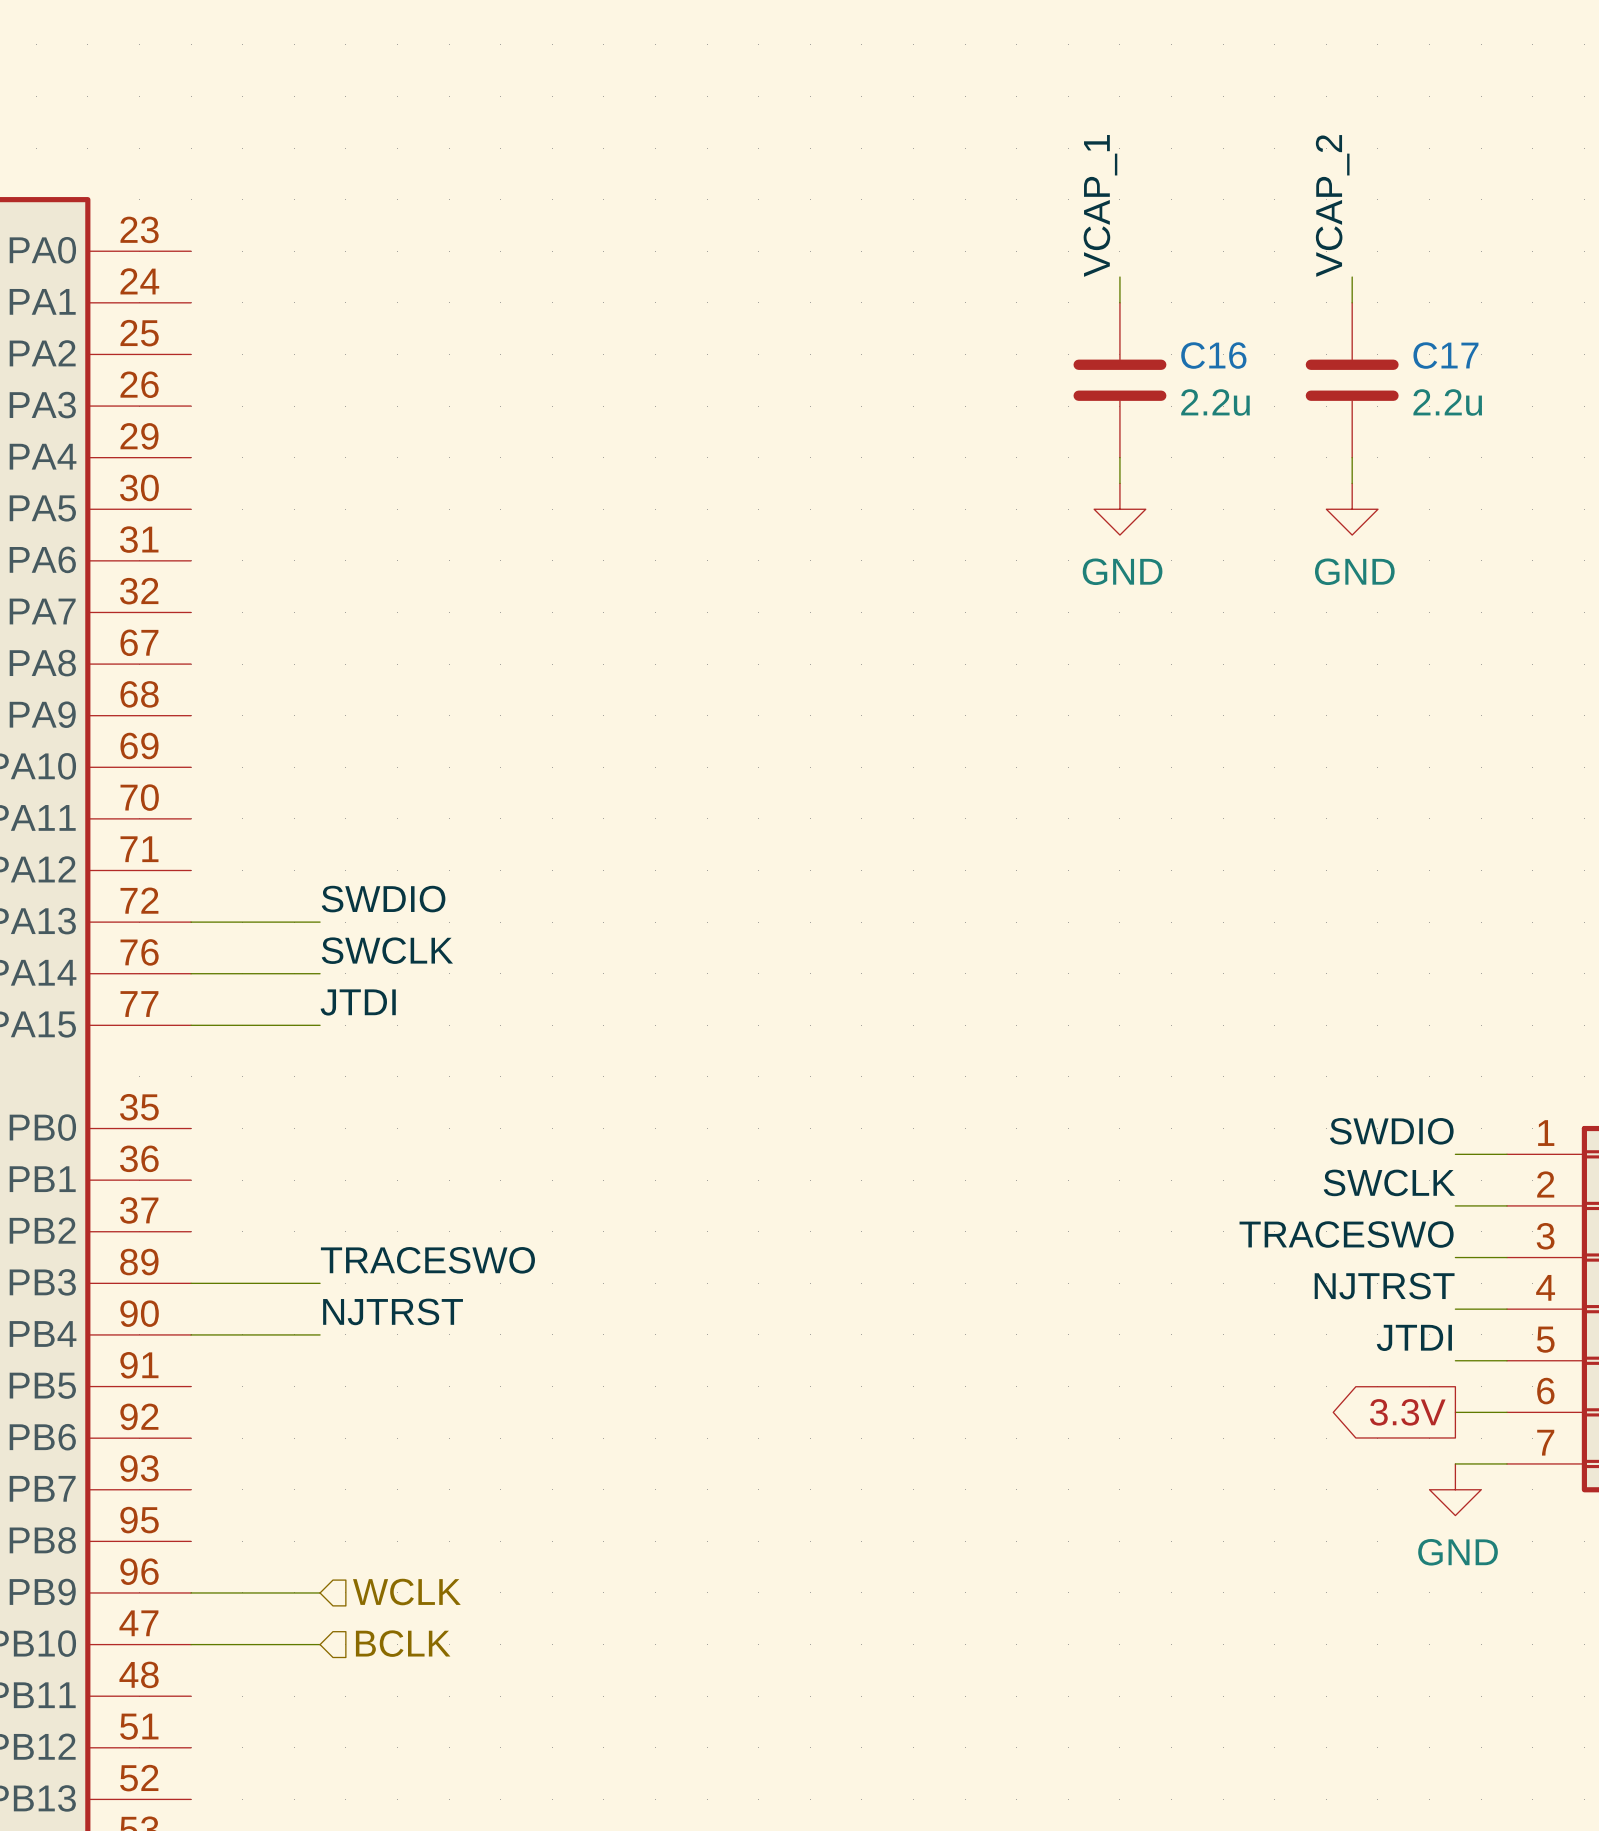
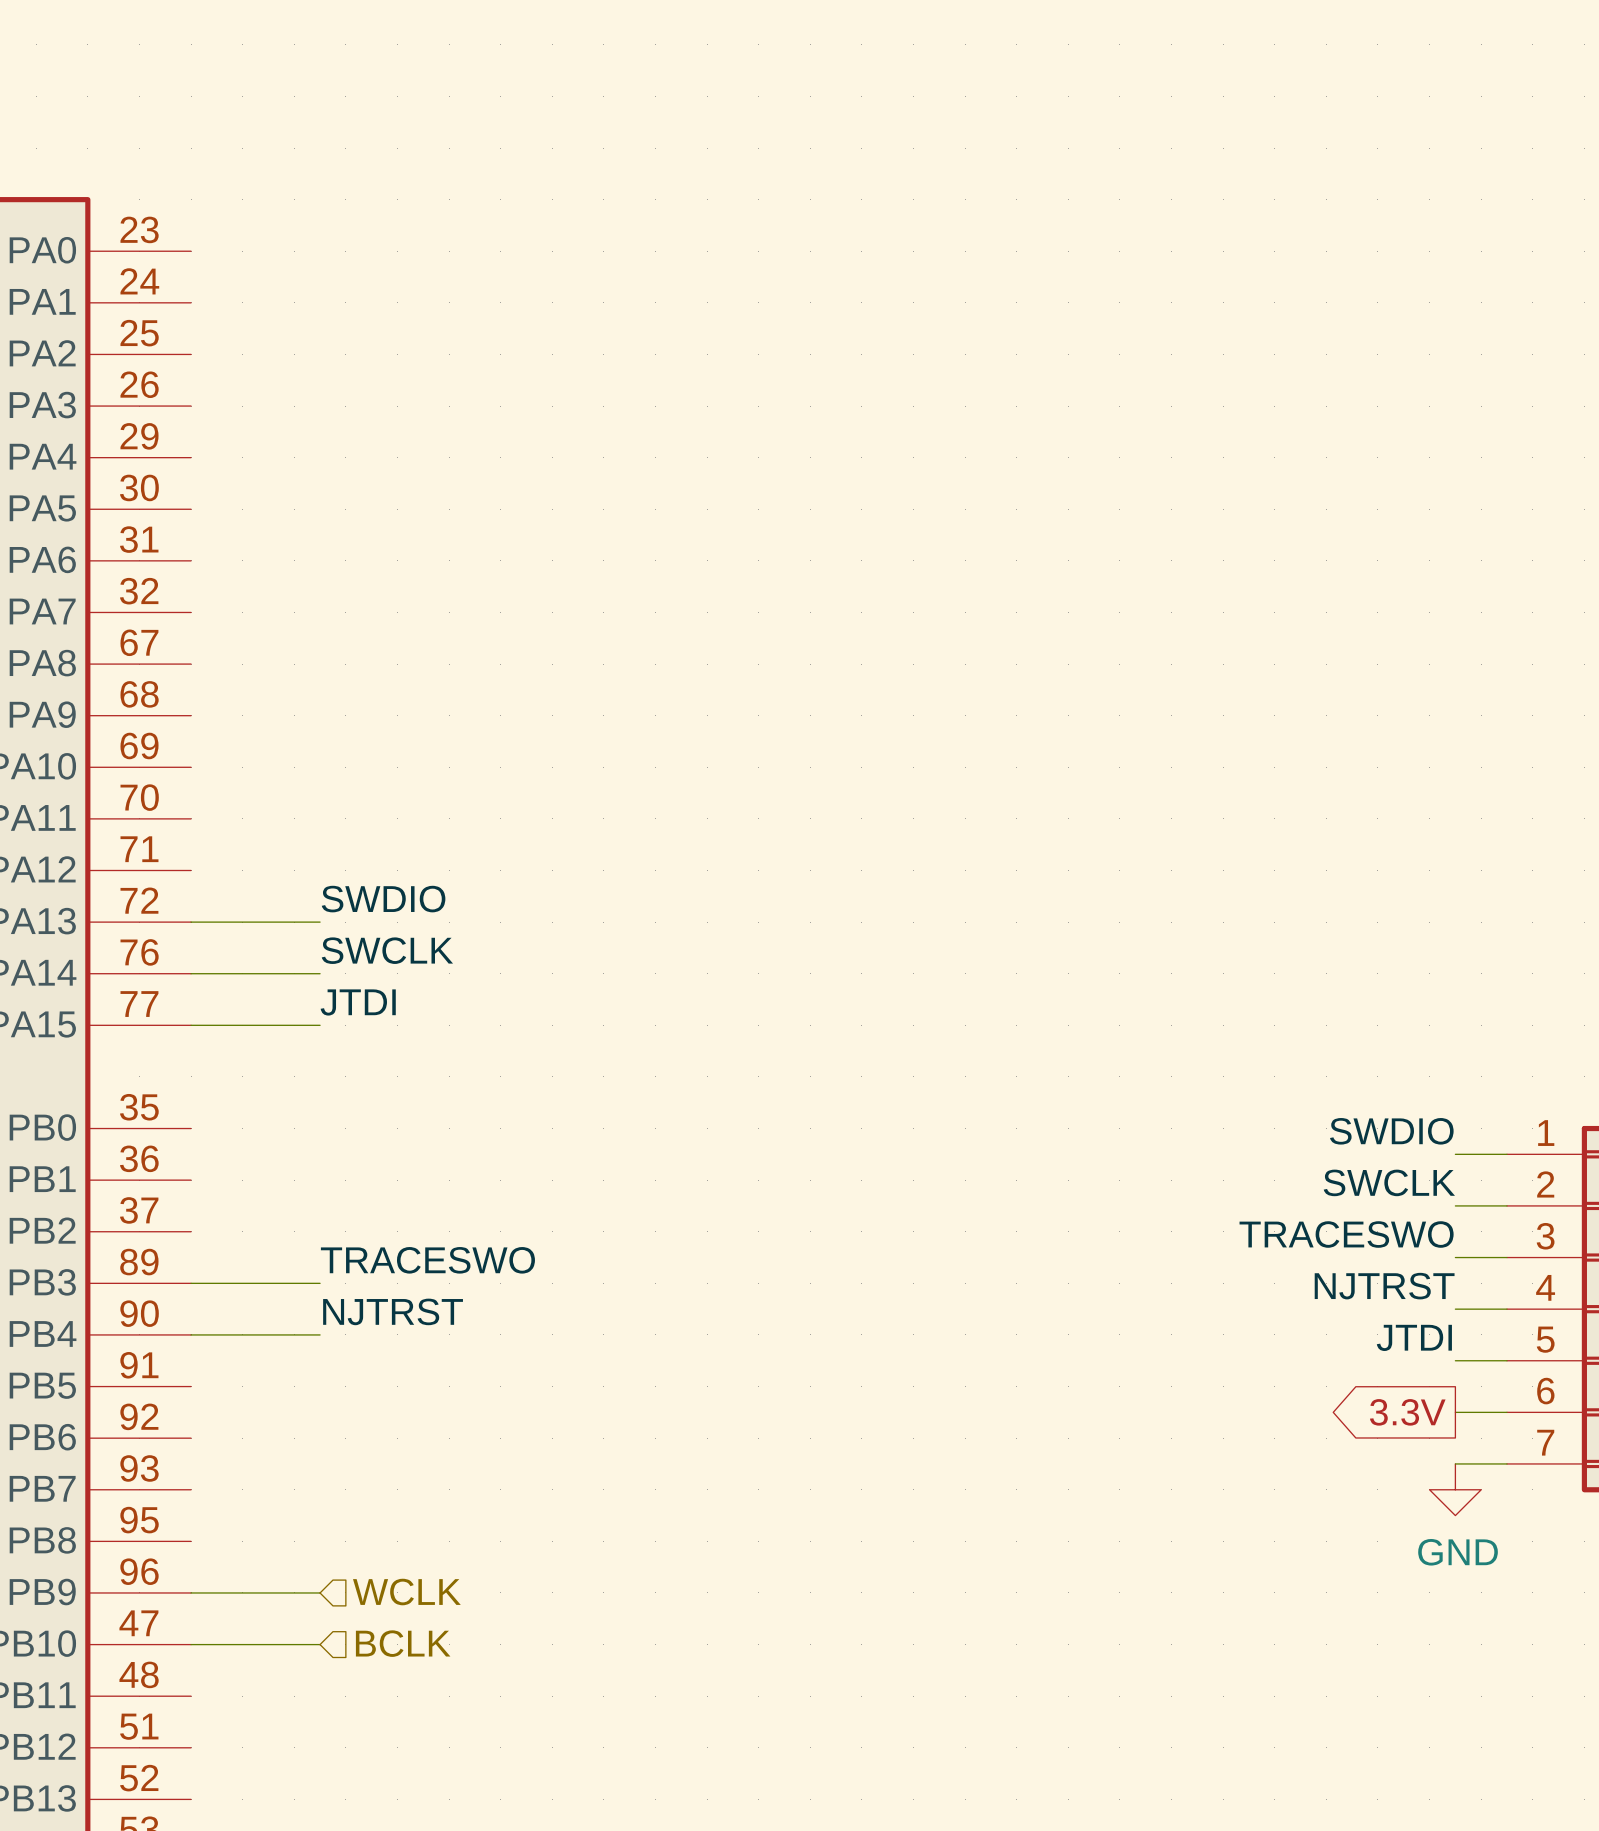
label: VCAP_1 (1100, 205) -> none
label: VCAP_2 (1332, 205) -> none
wire: (1119, 277) (1119, 302) -> none
wire: (1352, 277) (1352, 302) -> none
C16: 2.2u (1119, 380) -> none
C17: 2.2u (1352, 380) -> none
wire: (1119, 457) (1119, 483) -> none
wire: (1352, 457) (1352, 483) -> none
power symbol: GND (1119, 509) -> none
power symbol: GND (1352, 509) -> none

